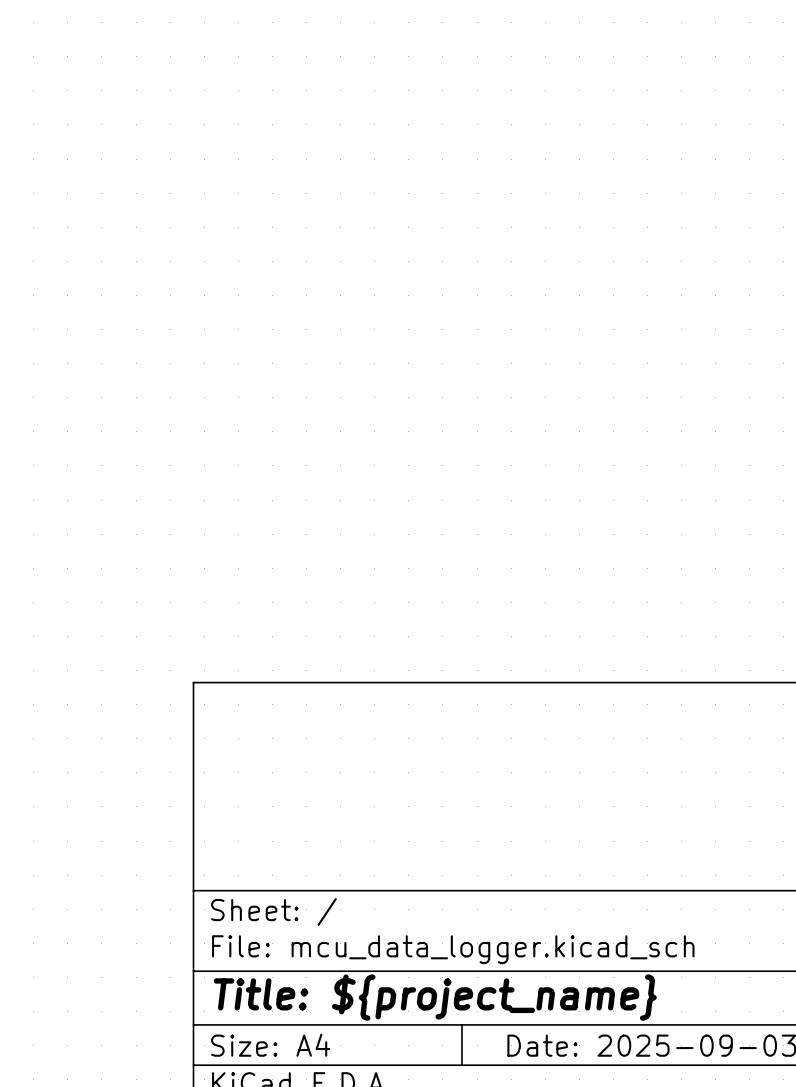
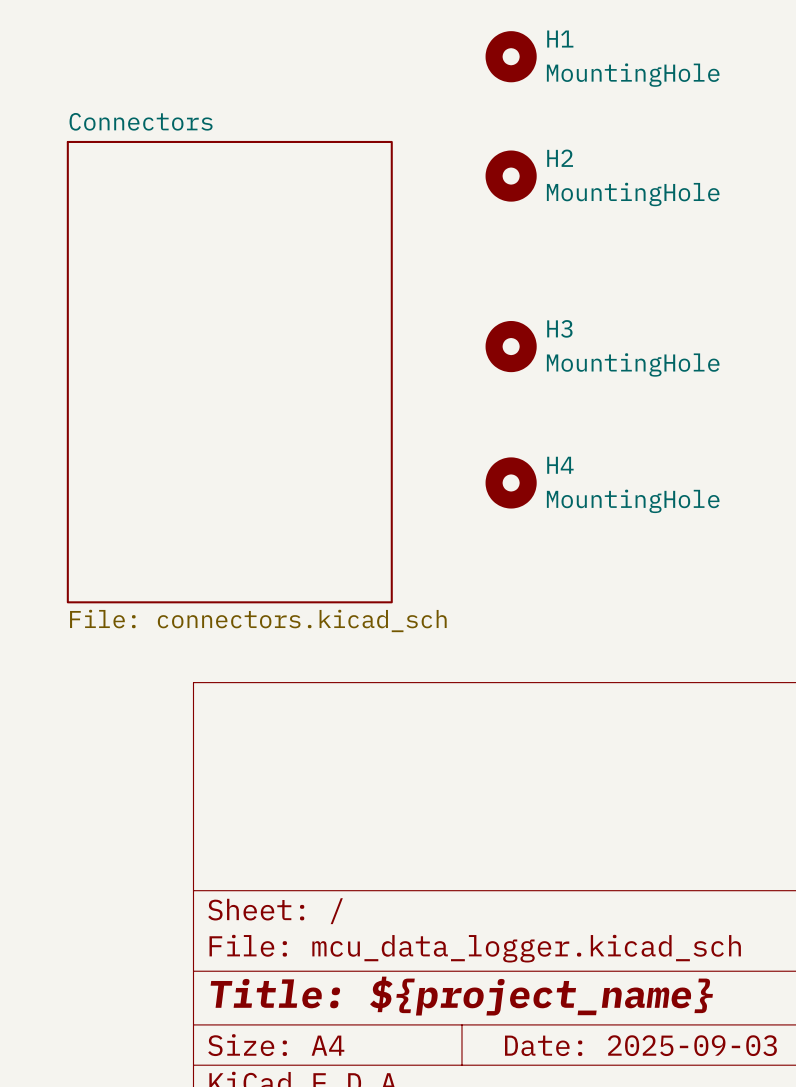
H1: none -> MountingHole (511, 56)
H2: none -> MountingHole (511, 176)
H3: none -> MountingHole (511, 346)
sheet Connectors: none -> File: connectors.kicad_sch (229, 372)
H4: none -> MountingHole (511, 482)

